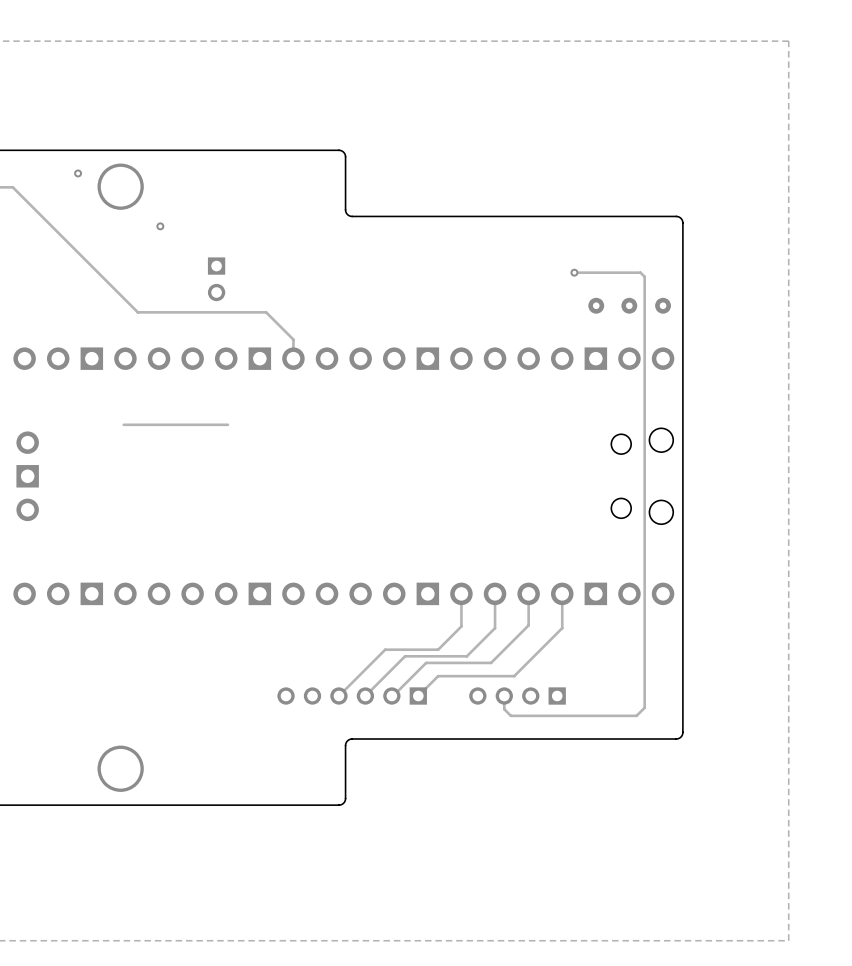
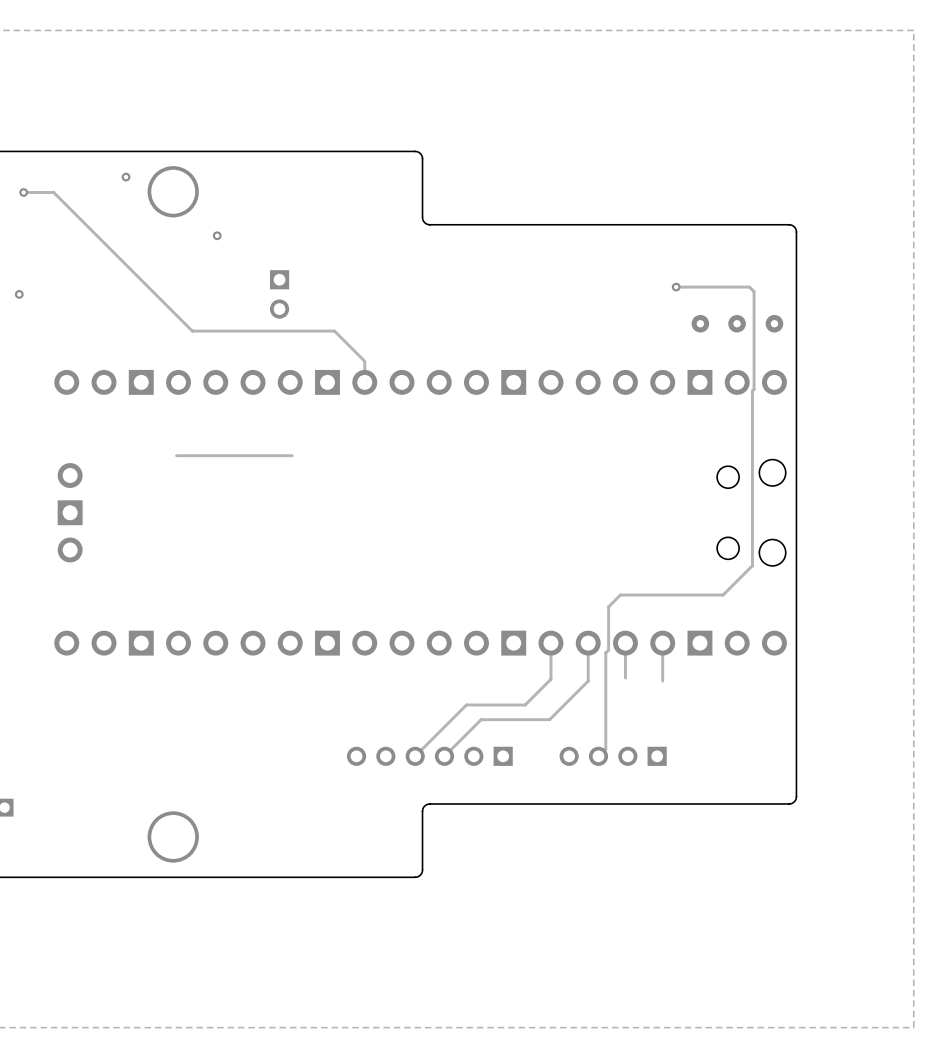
track: (644, 364) (644, 707) (636, 715) (510, 715) (504, 709) (504, 696) -> (754, 389) (752, 390) (752, 565) (723, 595) (620, 595) (608, 606) (608, 650) (605, 652) (605, 748) (598, 756)
track: (528, 625) (491, 662) (460, 662) -> none
track: (562, 628) (514, 676) (438, 676) (418, 696) -> none
track: (466, 656) (405, 656) (398, 662) -> (556, 712) (549, 719)
track: (426, 662) (393, 696) -> (511, 719) (481, 719)

